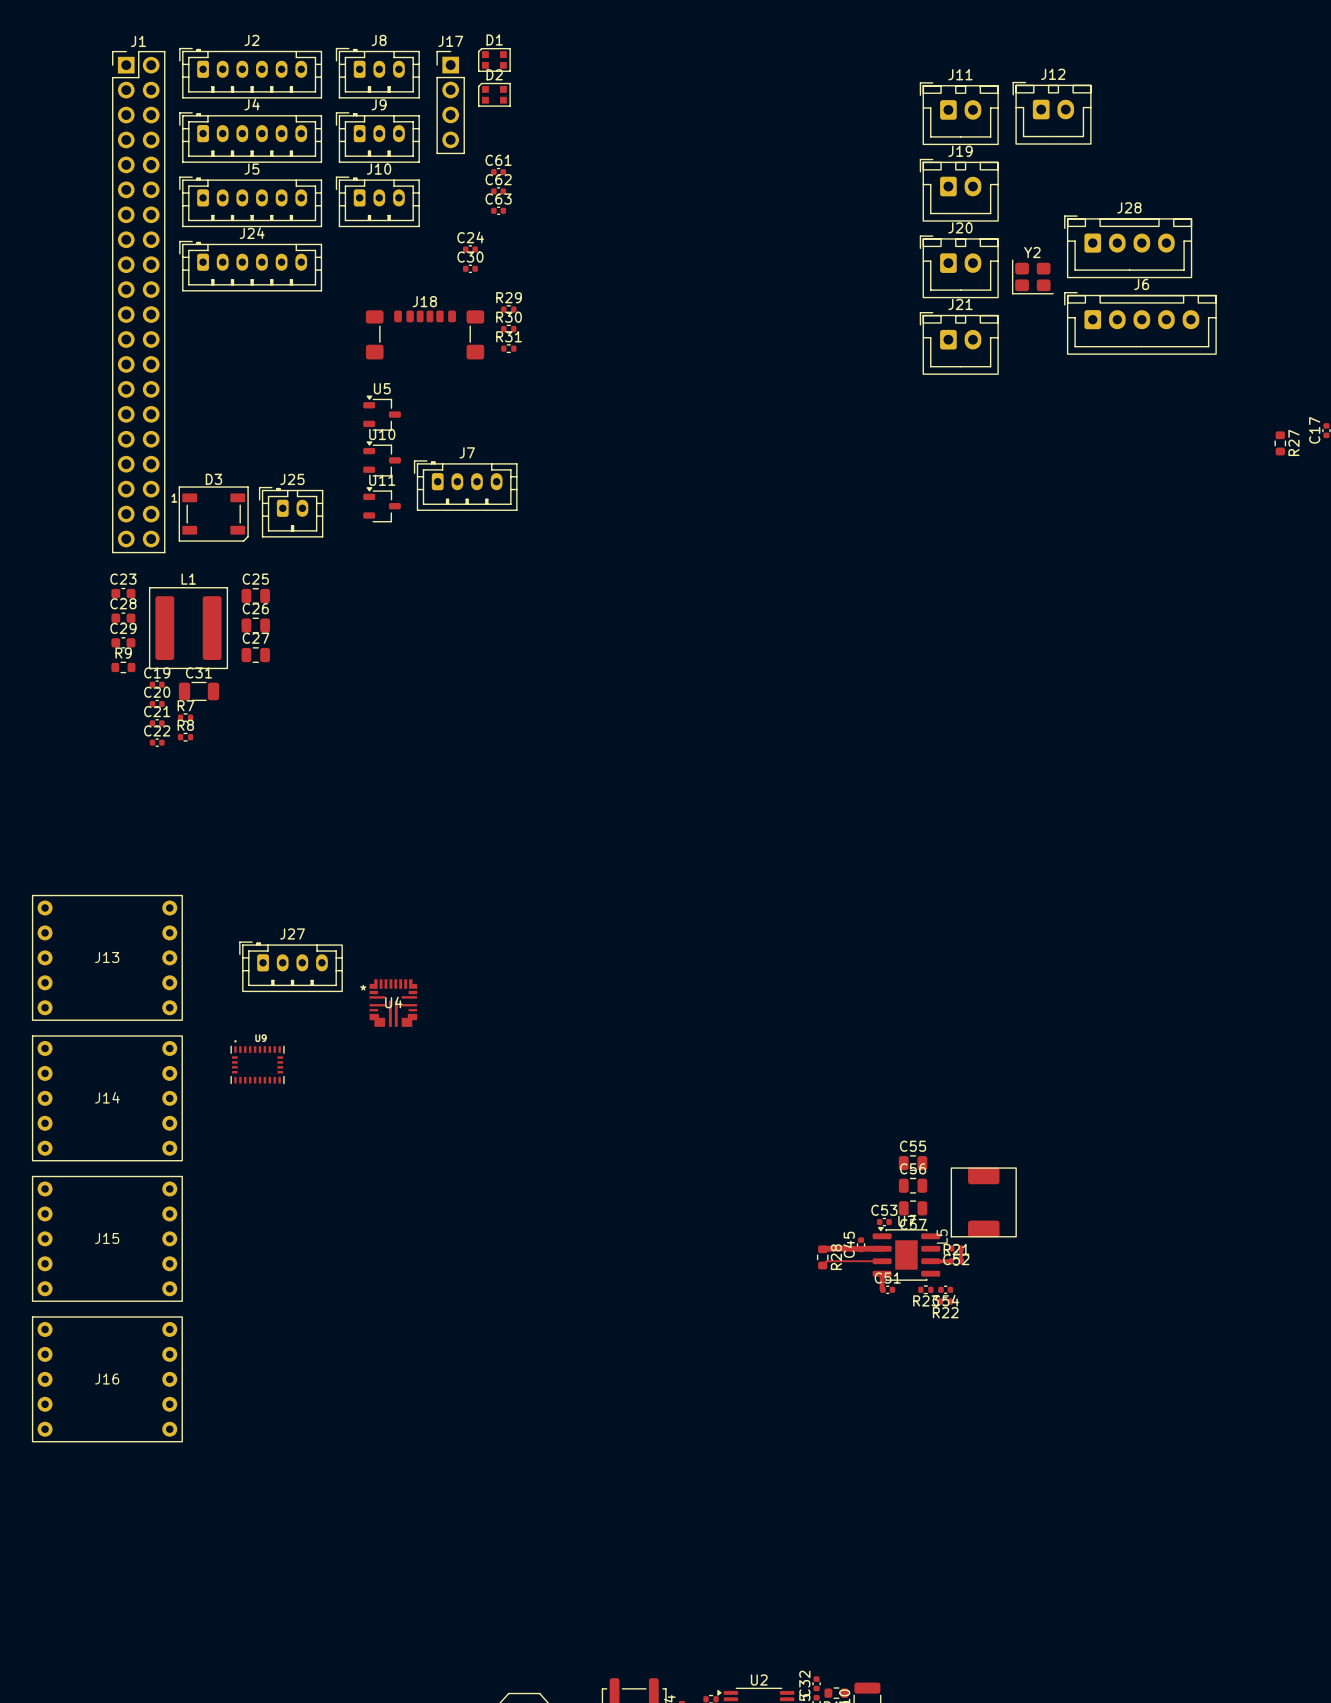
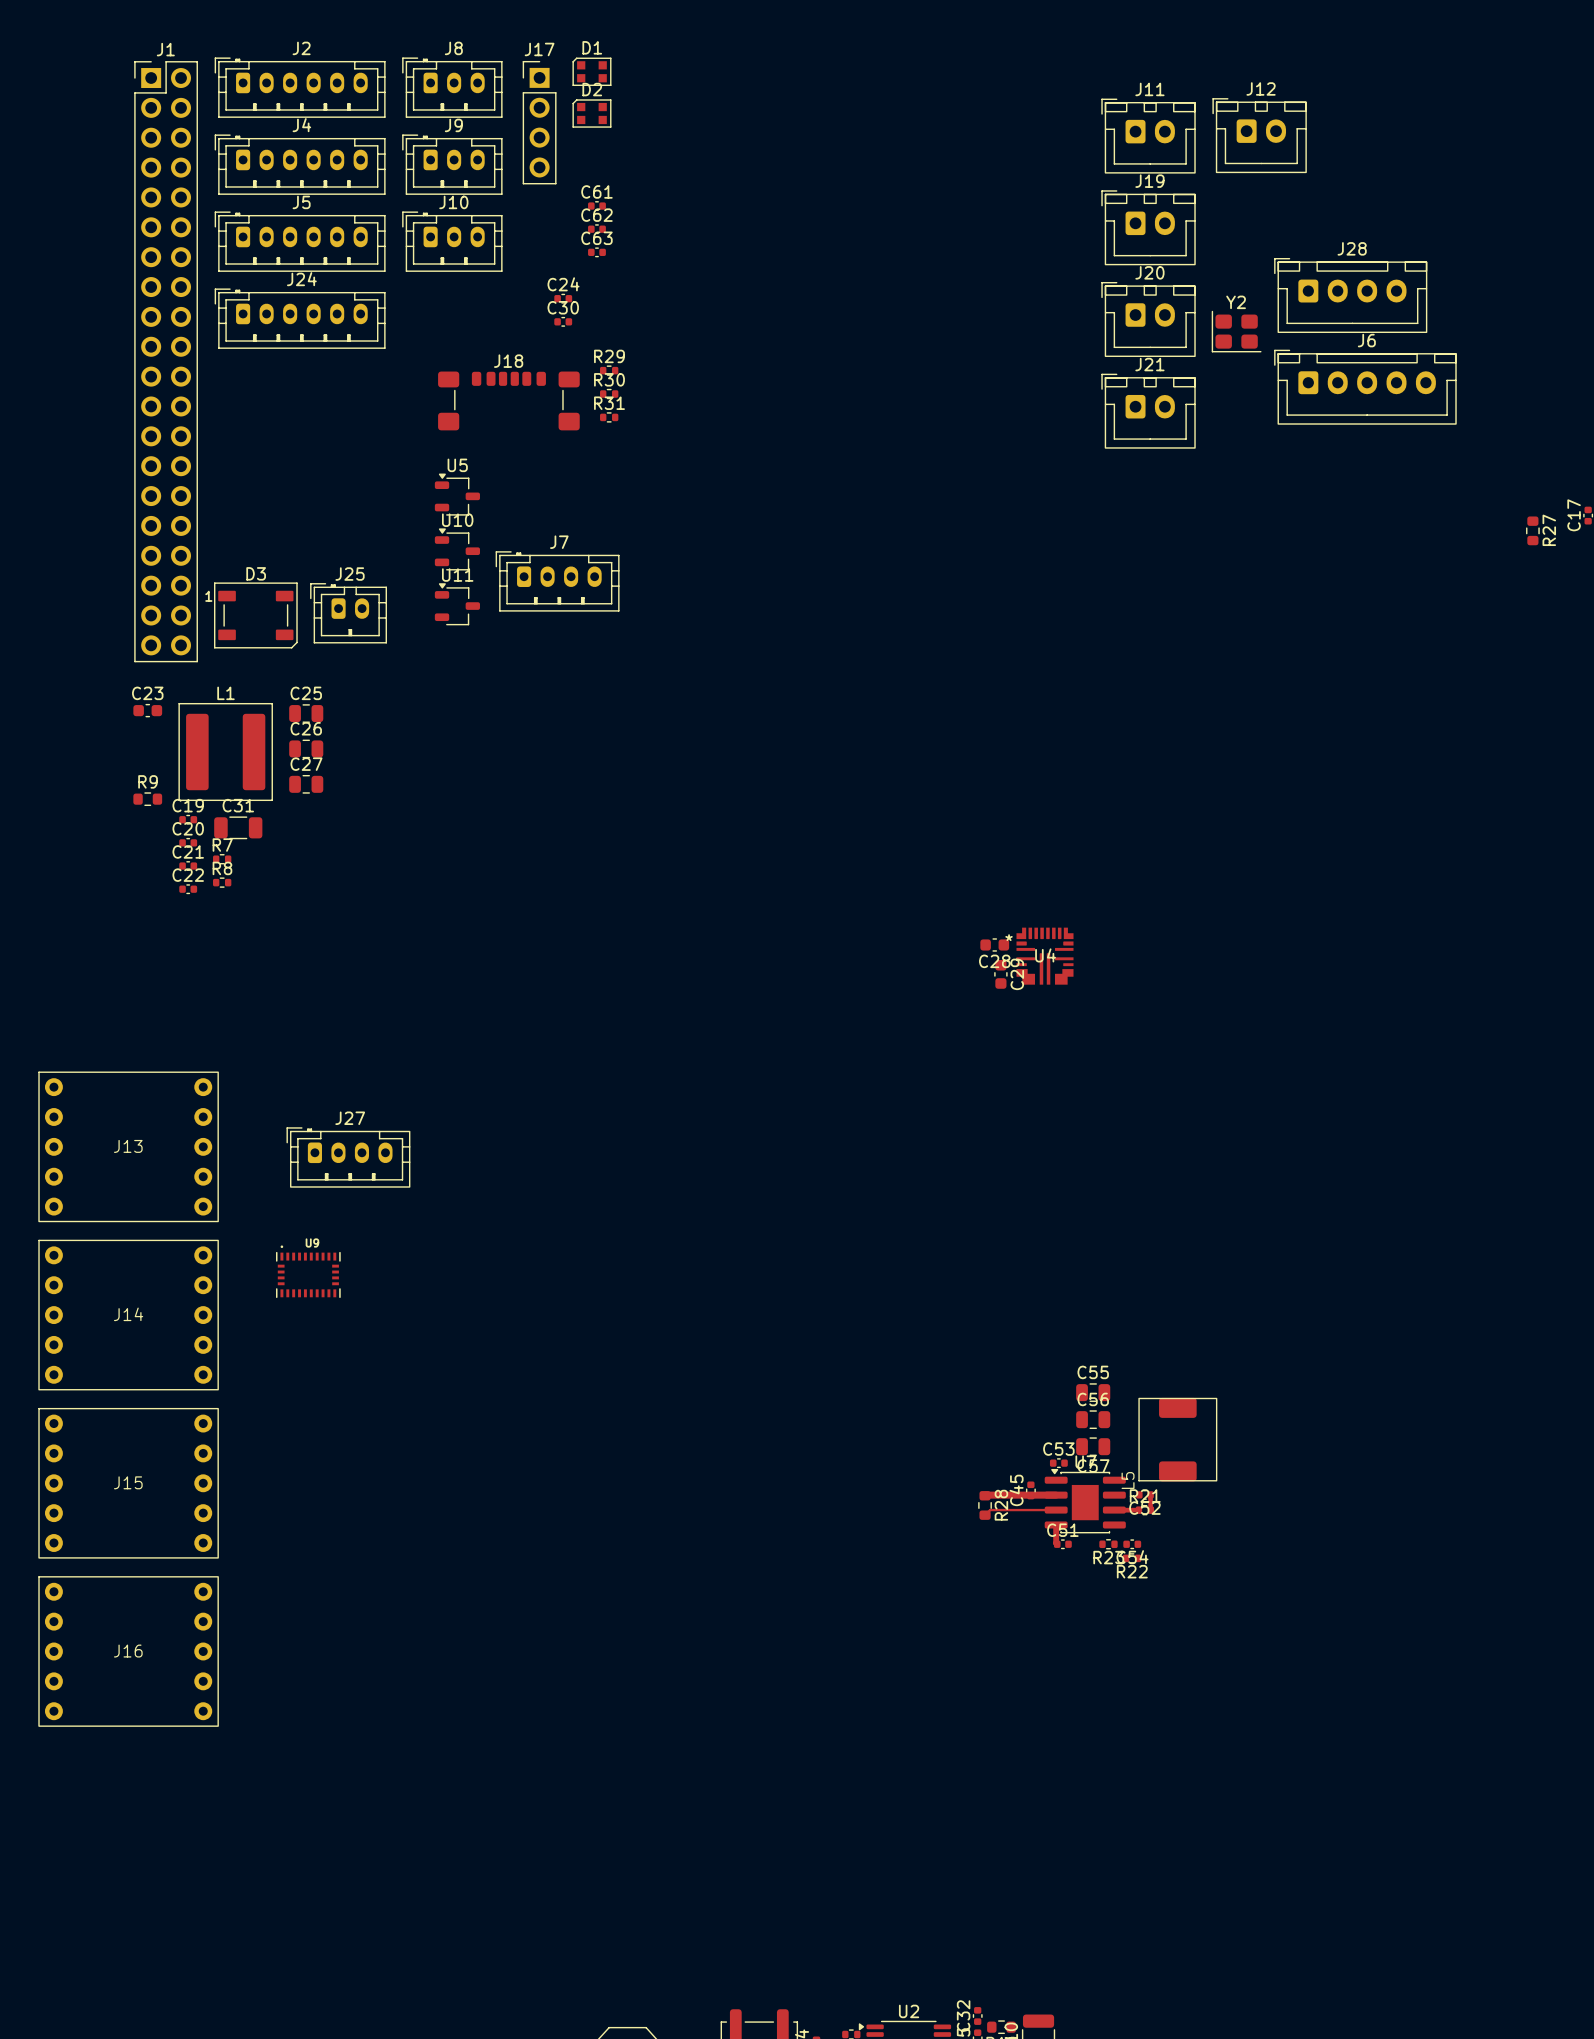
C28 name position: C28 (123, 603) -> C28 (994, 961)
C28 position: (123, 618) -> (994, 944)
C29 rotation: 0° (123, 642) -> 90° clockwise (1000, 974)
C29 position: (123, 642) -> (1000, 974)
U4 position: (393, 1003) -> (1045, 956)

